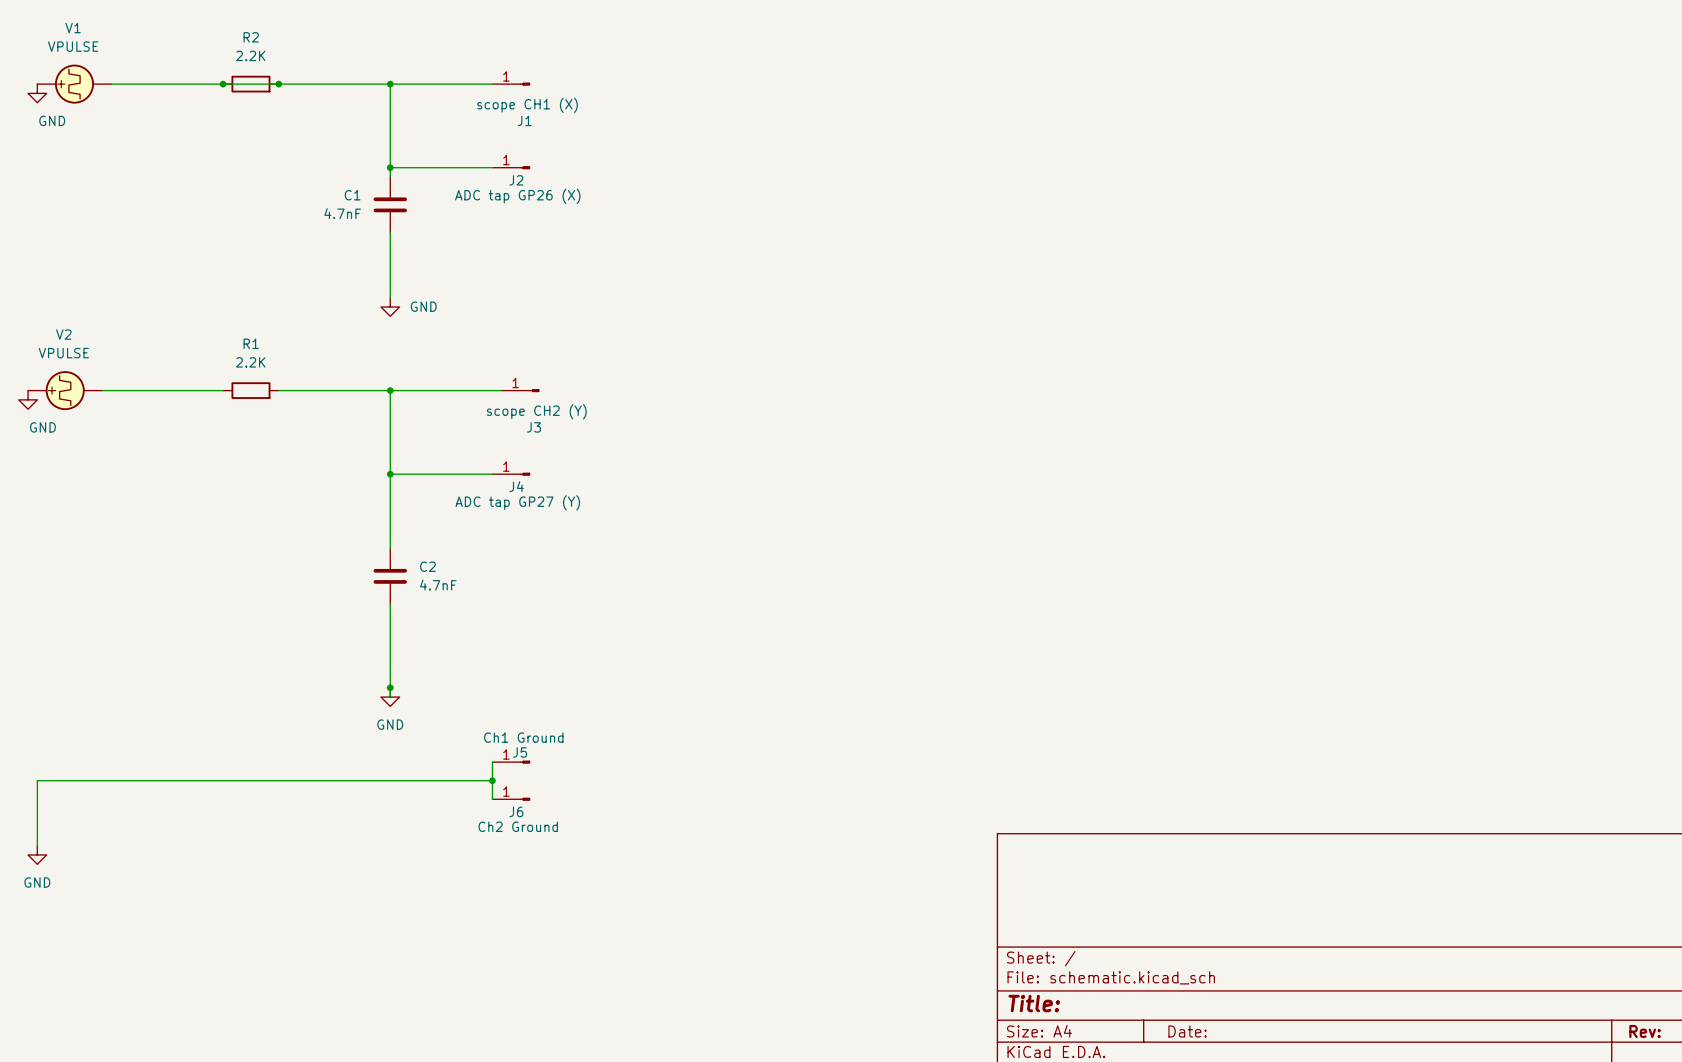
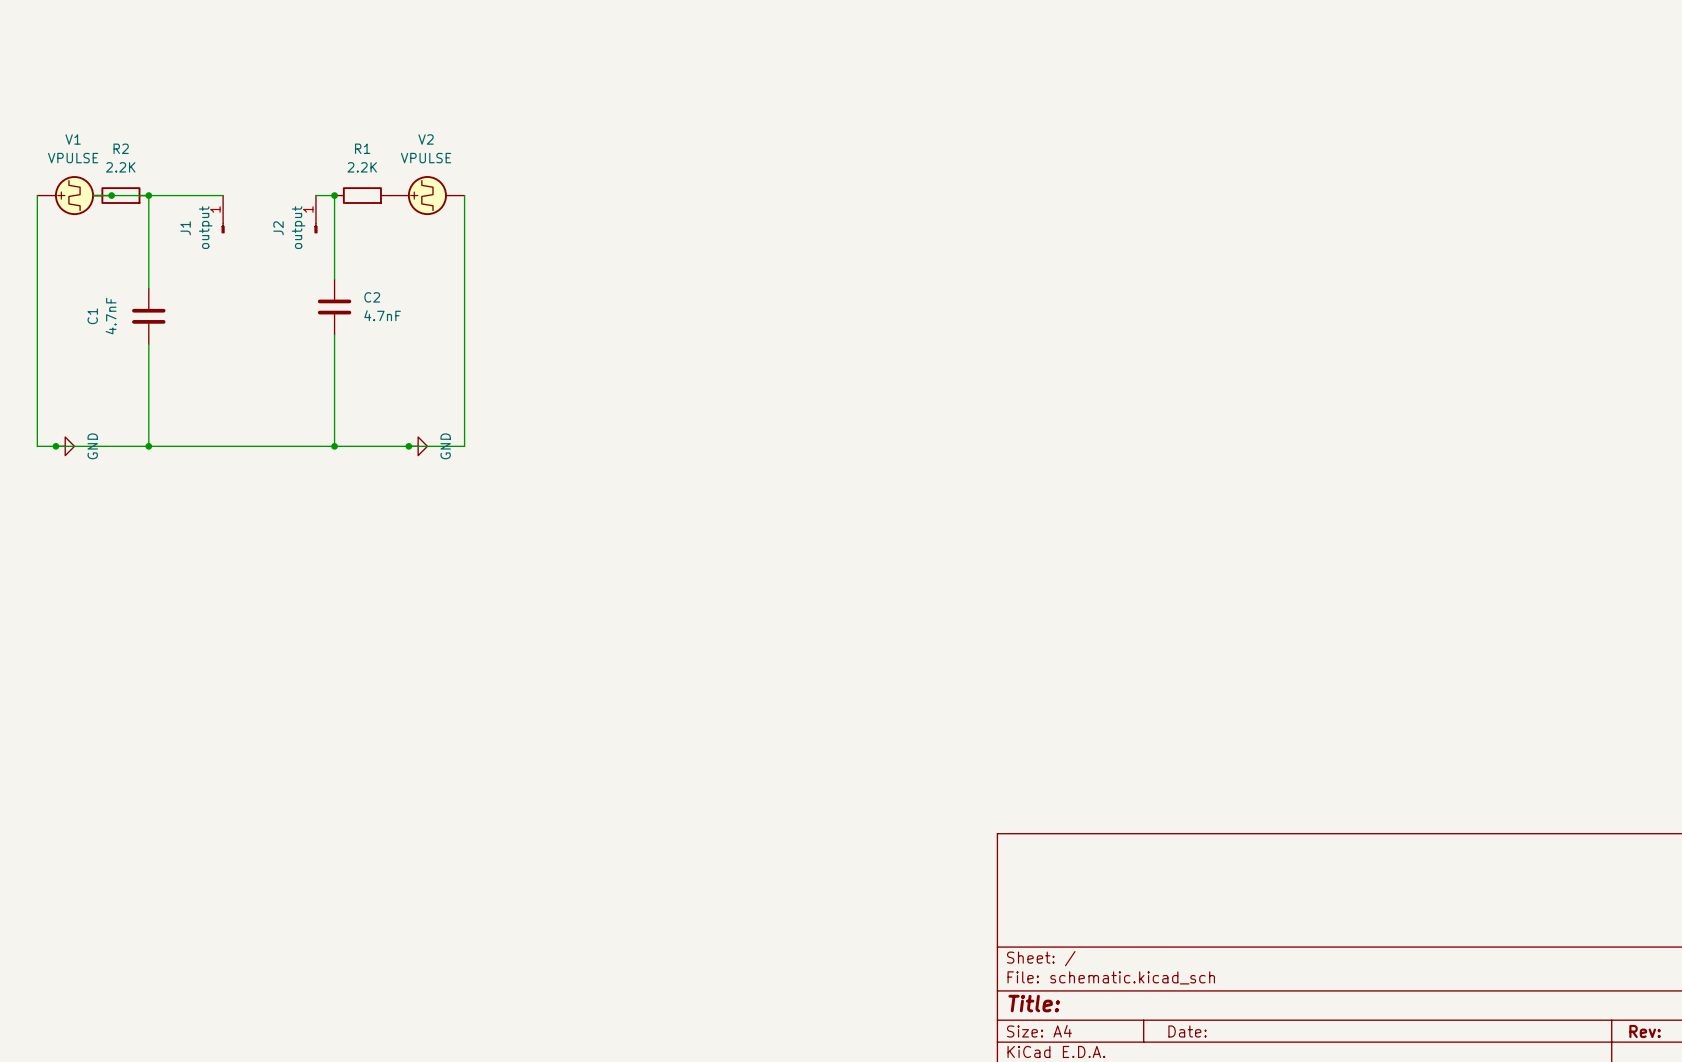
V1 position: (74, 84) -> (74, 195)
wire: (111, 84) (492, 84) -> none
junction: (223, 84) -> none
R2 position: (250, 84) -> (120, 195)
junction: (278, 84) -> none
wire: (390, 84) (390, 176) -> none
junction: (390, 84) -> none
J1 position: (511, 84) -> (223, 214)
J1 rotation: 0° (524, 84) -> 90° clockwise (223, 228)
power symbol: GND (37, 93) -> none
J1 value: scope CH1 (X) (527, 105) -> output (205, 227)
wire: (390, 167) (492, 167) -> none
junction: (390, 167) -> none
J2 position: (511, 167) -> (315, 214)
J2 rotation: 0° (524, 167) -> 90° clockwise (315, 228)
J2 name position: J2 (516, 180) -> J2 (278, 228)
wire: none -> (37, 195) (37, 446) (464, 446) (464, 195)
wire: none -> (93, 195) (223, 195)
junction: none -> (111, 195)
wire: none -> (148, 195) (148, 288)
junction: none -> (148, 195)
wire: none -> (315, 195) (334, 195) (334, 279)
junction: none -> (334, 195)
C1 name rotation: 0° (352, 195) -> 90° counterclockwise (92, 316)
J2 value: ADC tap GP26 (X) (517, 196) -> output (298, 227)
C1 position: (390, 204) -> (148, 316)
C1 value rotation: 0° (342, 213) -> 90° counterclockwise (111, 316)
wire: (390, 232) (390, 297) -> none
power symbol: GND (390, 307) -> none
wire: none -> (334, 334) (334, 446)
wire: none -> (148, 344) (148, 446)
V2 position: (65, 390) -> (427, 195)
wire: (102, 390) (223, 390) -> none
R1 position: (250, 390) -> (362, 195)
wire: (278, 390) (501, 390) -> none
wire: (390, 390) (390, 548) -> none
junction: (390, 390) -> none
J3: scope CH2 (Y) (520, 390) -> none
power symbol rotation: 0° (28, 399) -> 90° counterclockwise (65, 446)
power symbol position: GND (28, 399) -> GND (65, 446)
power symbol text position: GND (42, 427) -> GND (92, 446)
junction: none -> (55, 446)
junction: none -> (148, 446)
junction: none -> (334, 446)
junction: none -> (408, 446)
power symbol: none -> GND (418, 446)
wire: (390, 474) (492, 474) -> none
junction: (390, 474) -> none
J4: ADC tap GP27 (Y) (511, 474) -> none
C2 position: (390, 576) -> (334, 307)
wire: (390, 604) (390, 697) -> none
junction: (390, 687) -> none
power symbol: GND (390, 697) -> none
wire: (492, 762) (492, 799) -> none
J5: Ch1 Ground (511, 762) -> none
wire: (492, 780) (37, 780) (37, 845) -> none
junction: (492, 780) -> none
J6: Ch2 Ground (511, 799) -> none
power symbol: GND (37, 854) -> none

